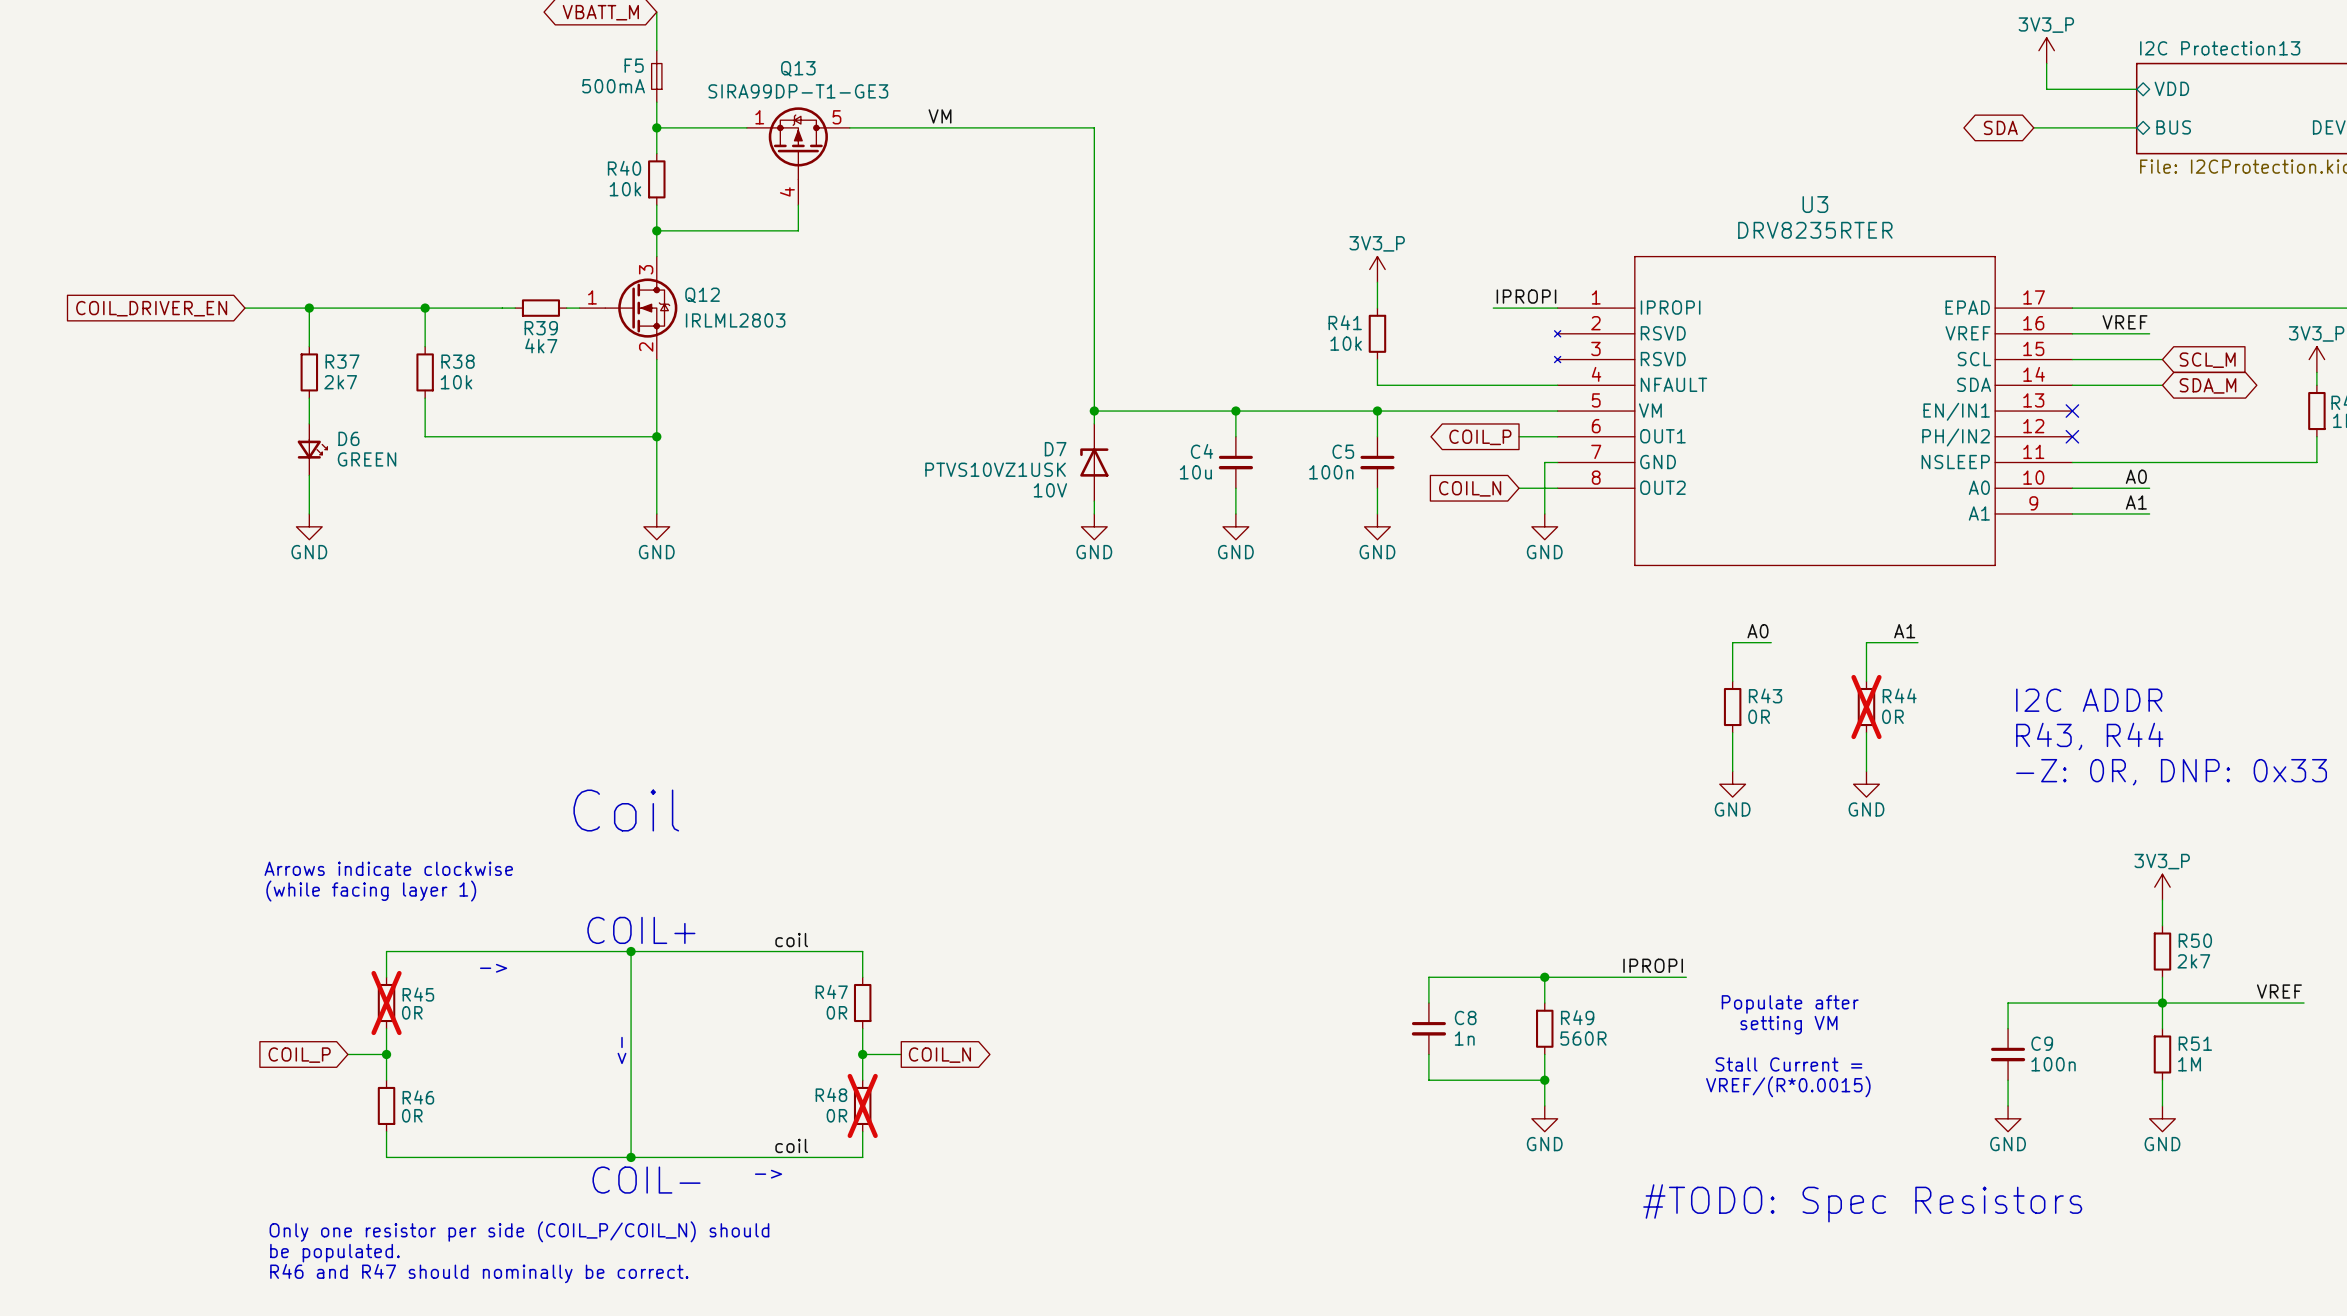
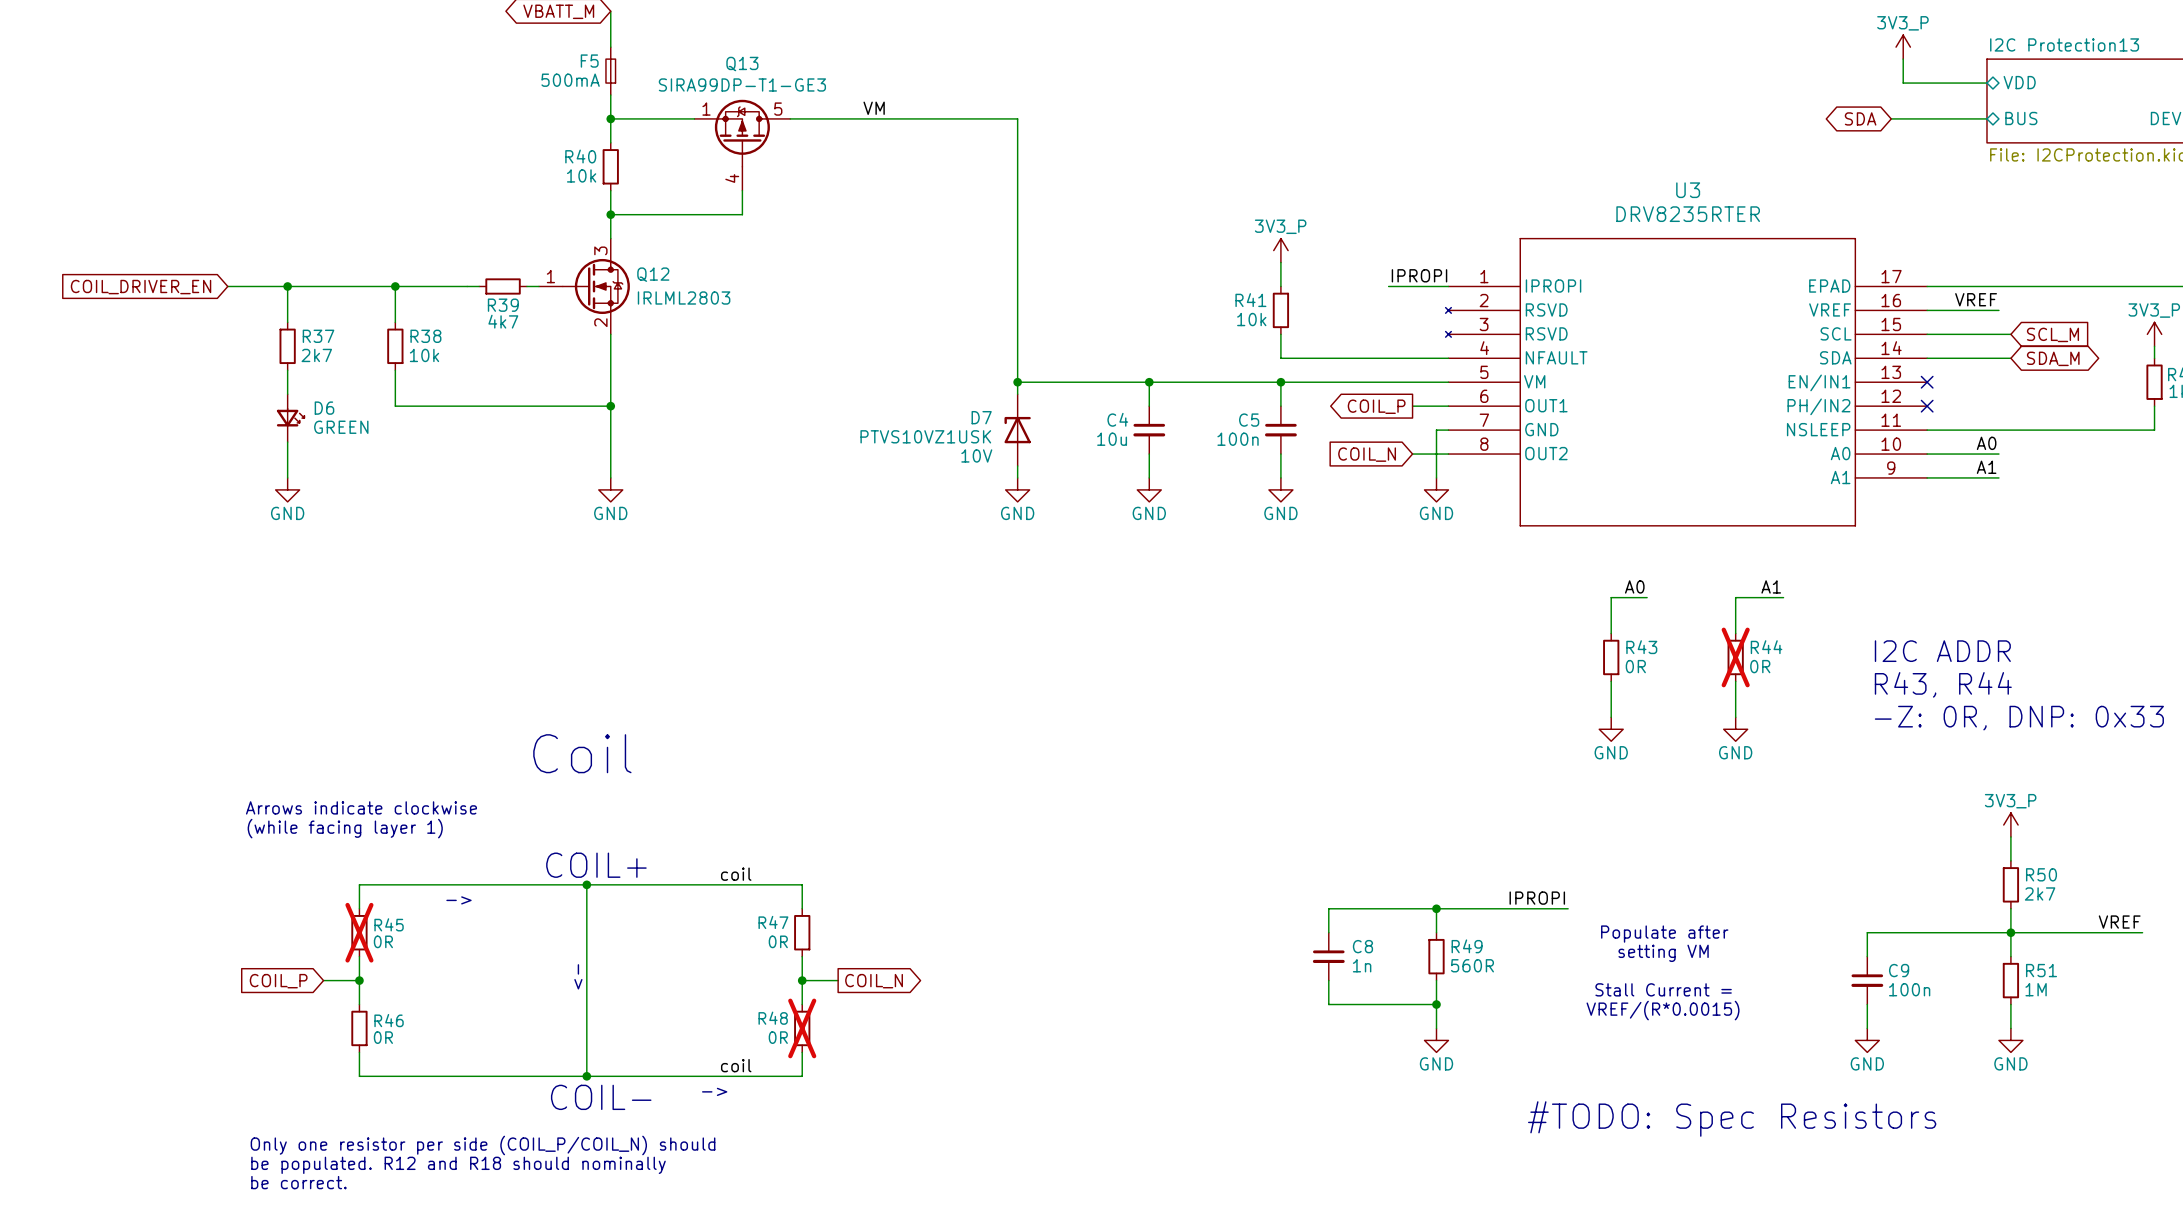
text: be populated. (334, 1253) -> be populated. R12 and R18 should nominally (458, 1165)
text: R46 and R47 should nominally be correct. (479, 1273) -> be correct. (298, 1182)

